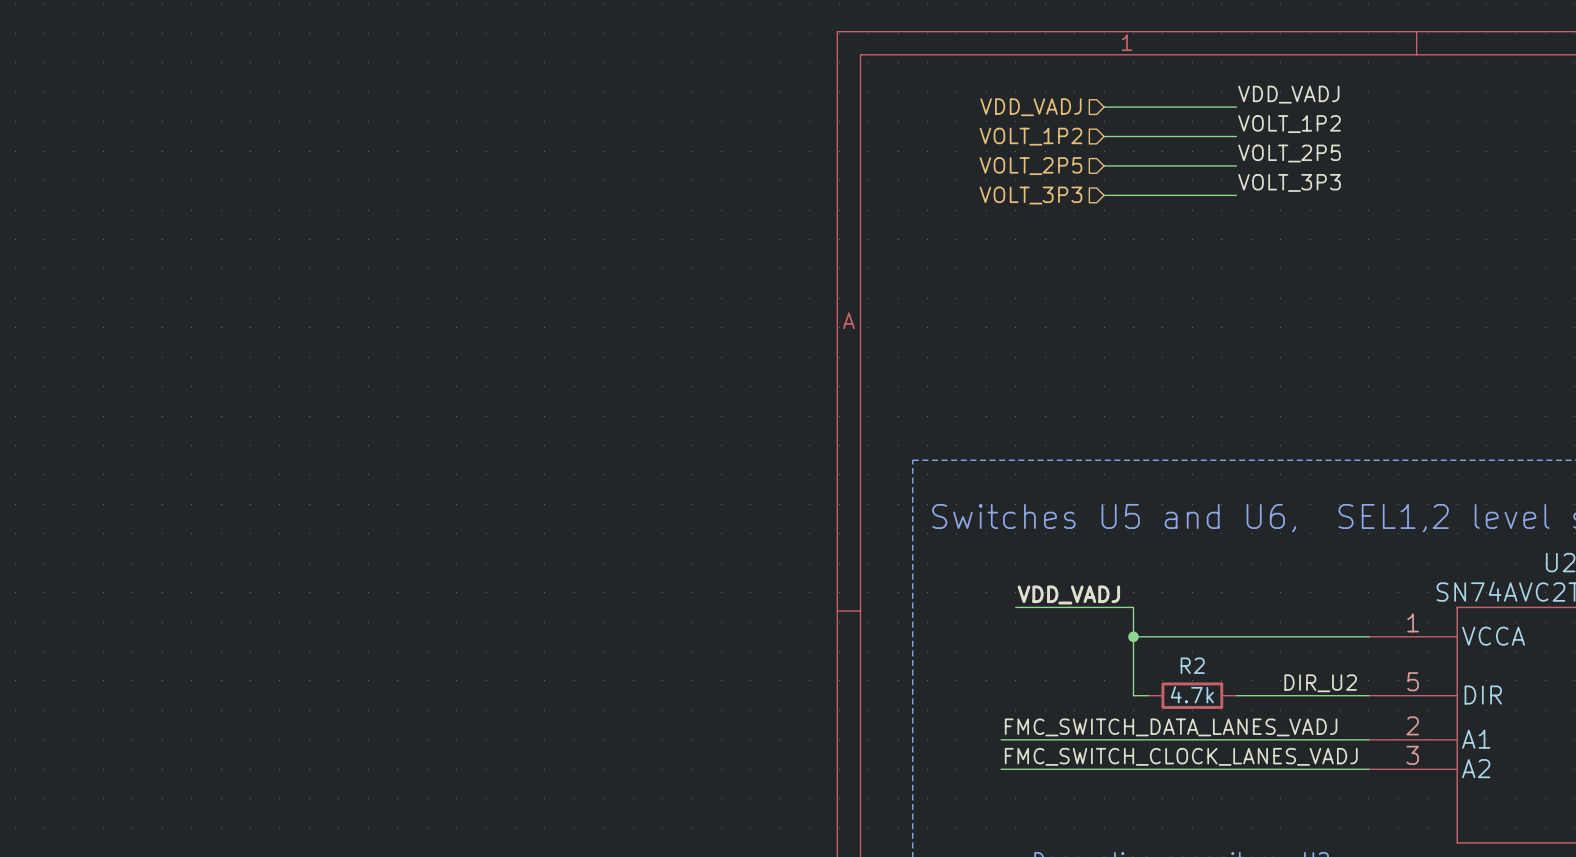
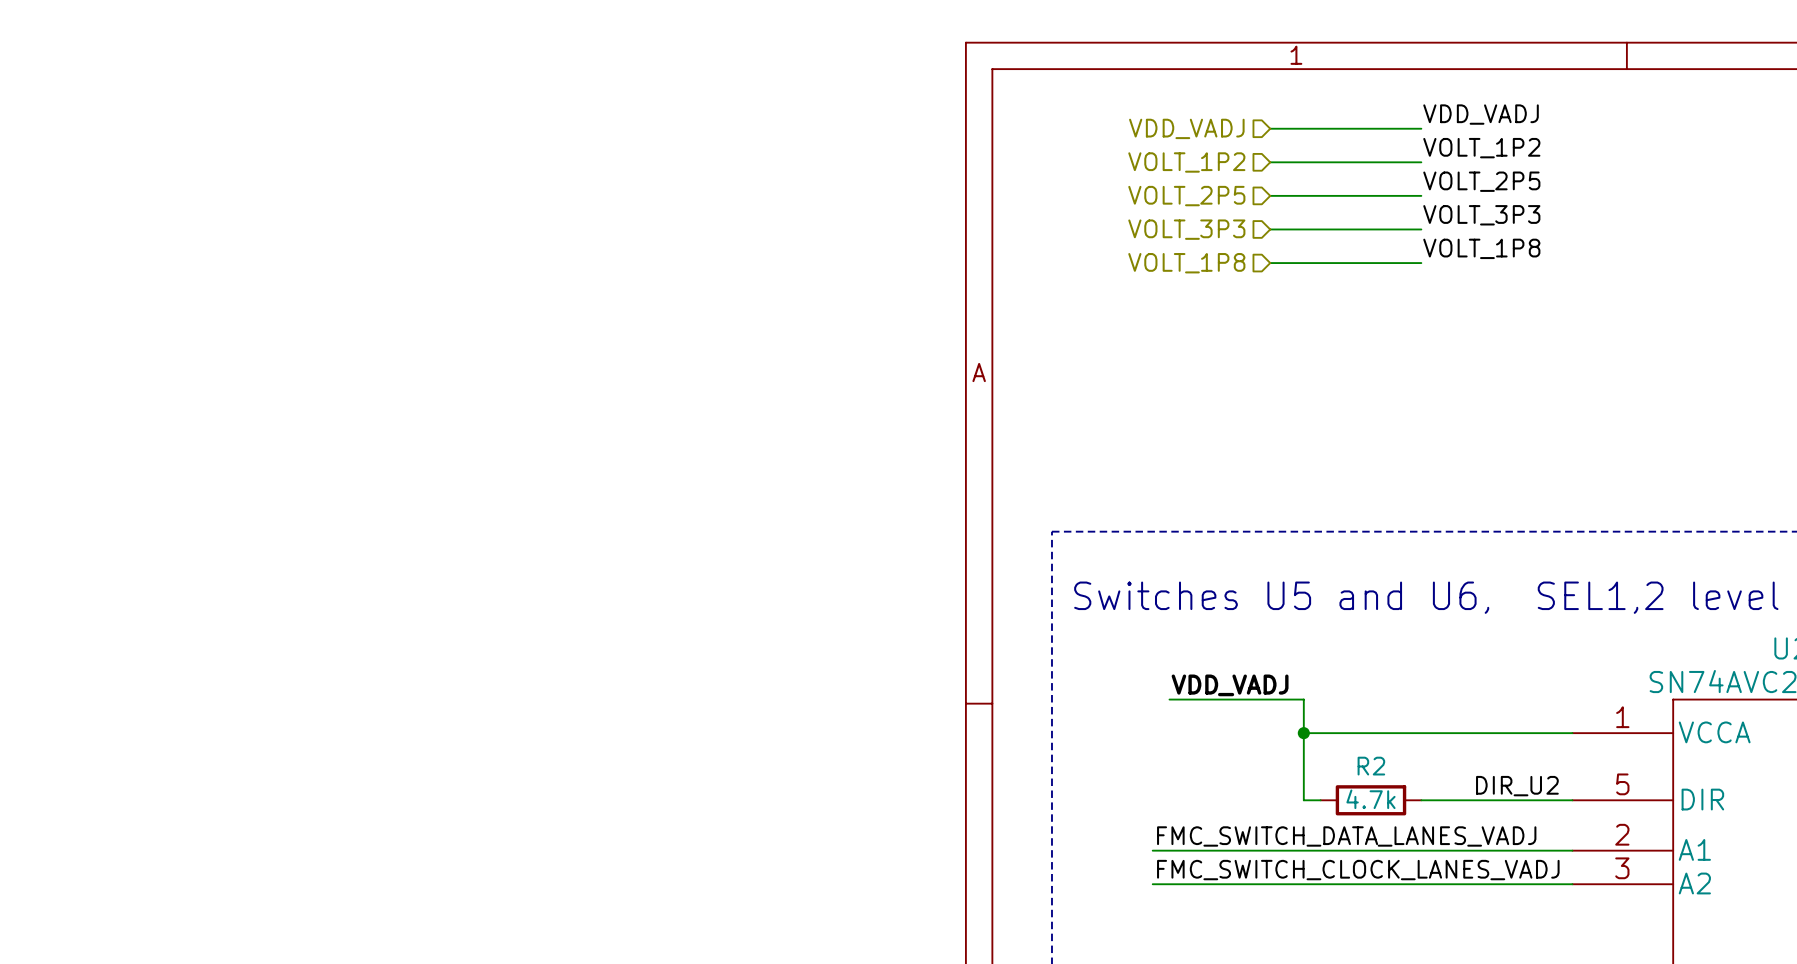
label: none -> VOLT_1P8 (1481, 248)
hierarchical label: none -> VOLT_1P8 (1186, 263)
wire: none -> (1270, 263) (1421, 263)

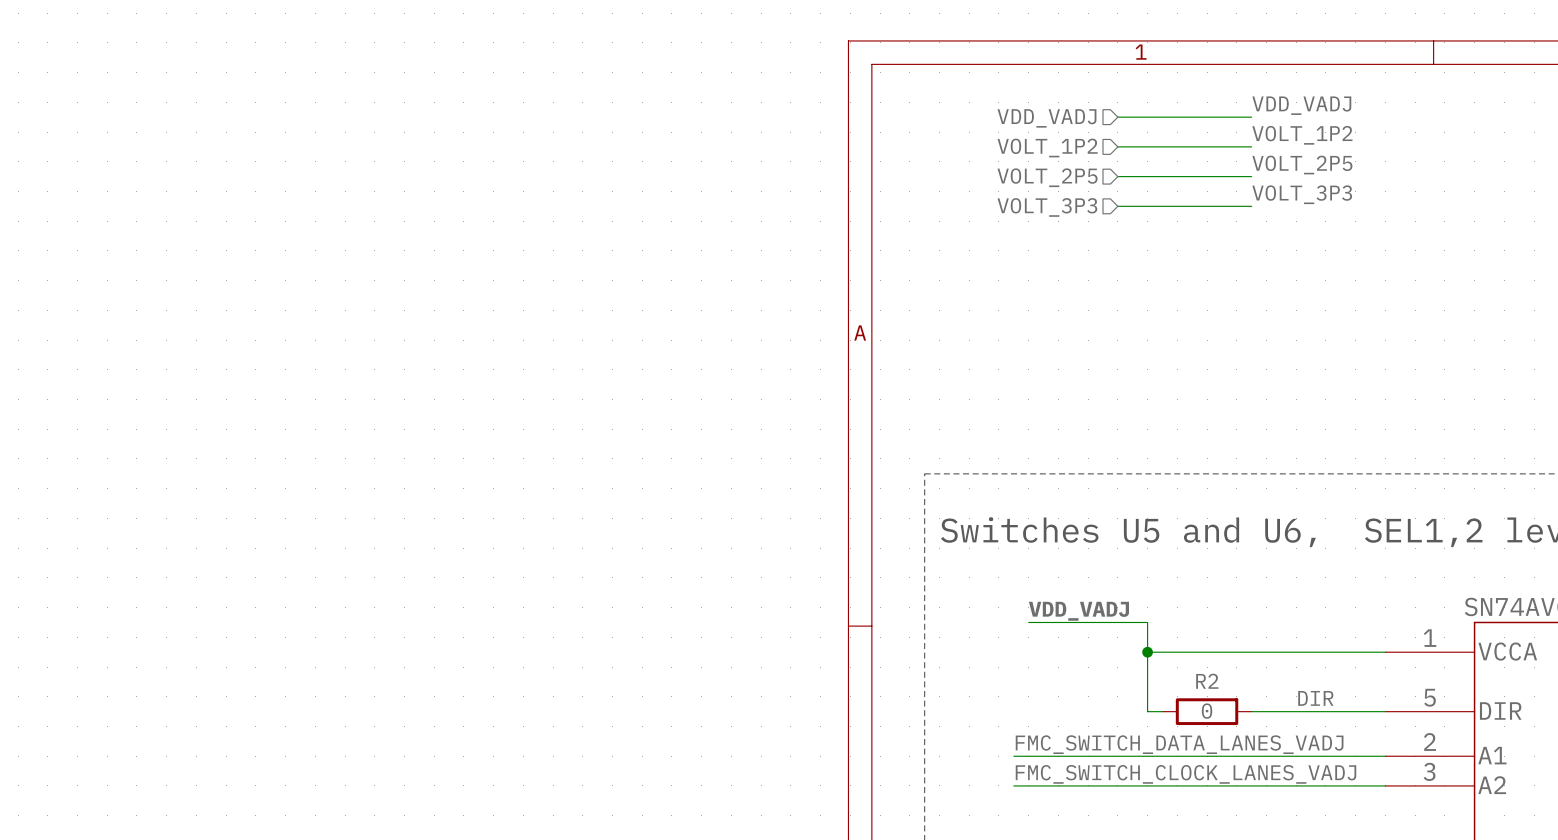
label: VOLT_1P8 (1481, 248) -> none
hierarchical label: VOLT_1P8 (1186, 263) -> none
wire: (1270, 263) (1421, 263) -> none
label: DIR_U2 (1517, 786) -> DIR (1315, 698)
R2 value: 4.7k (1370, 799) -> 0 (1207, 711)

